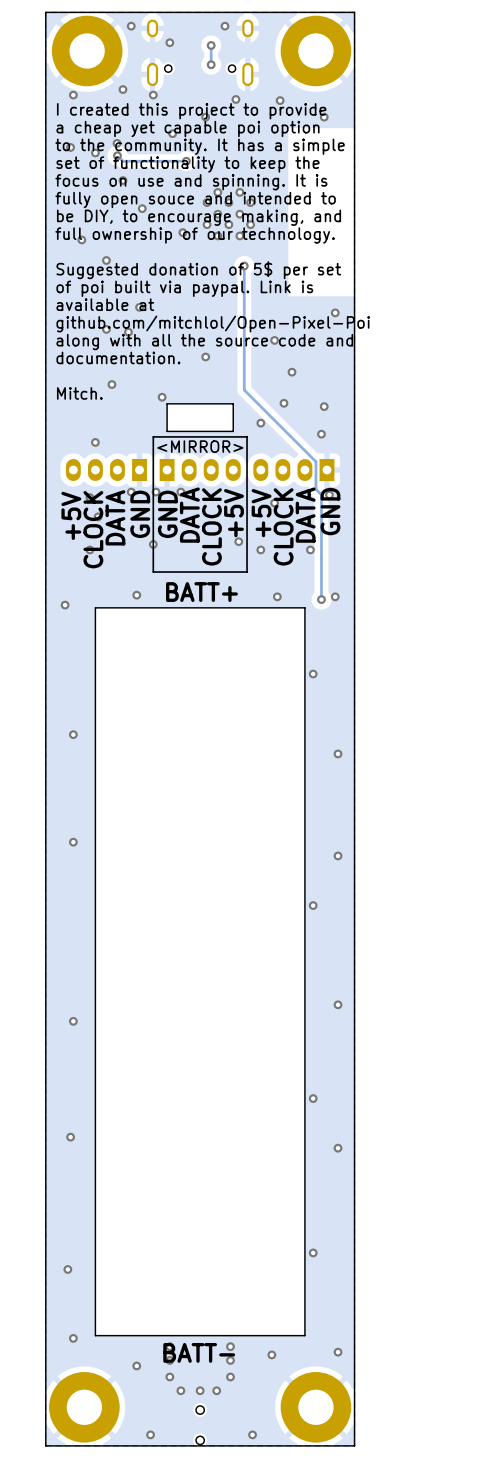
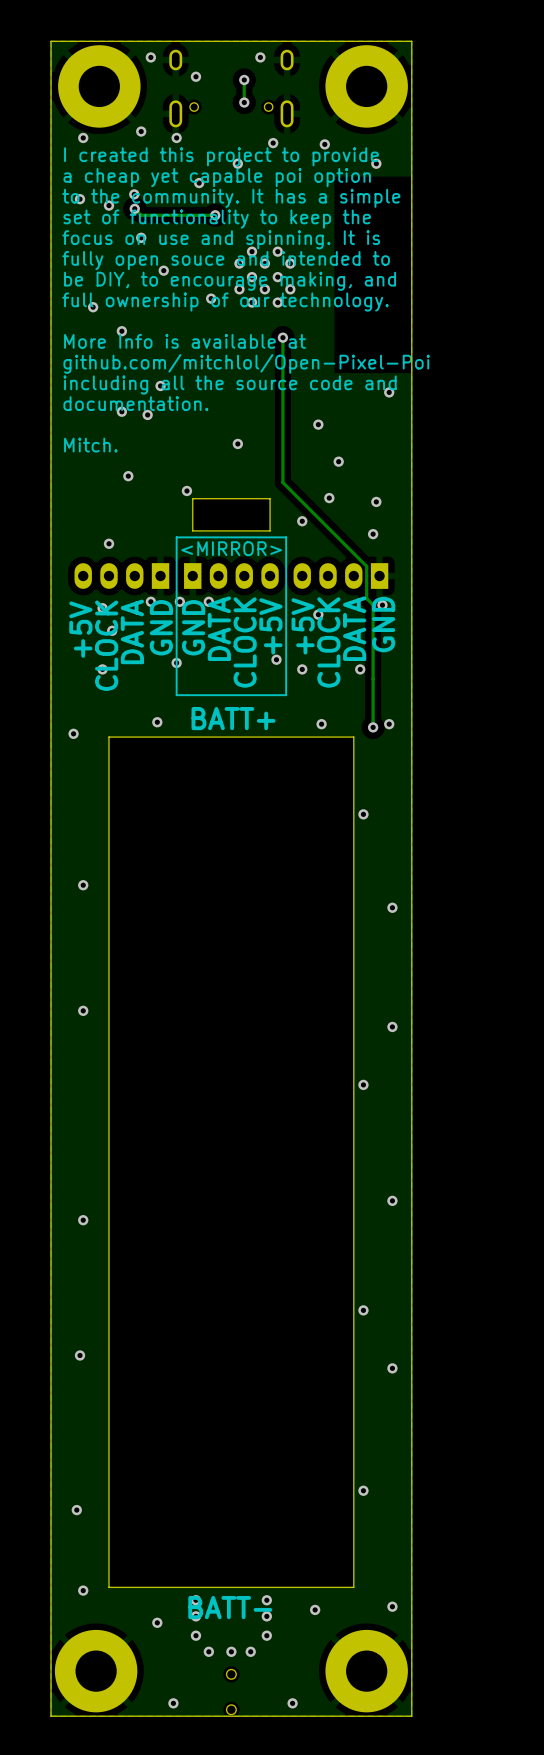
text: Suggested donation of 5$ per set (198, 270) -> More Info is available at (184, 341)
text: of poi built via paypal. Link is (184, 288) -> github.com/mitchlol/Open-Pixel-Poi (246, 363)
text: available at (105, 304) -> including all the source code and (230, 385)
text: github.com/mitchlol/Open-Pixel-Poi (213, 324) -> documentation. (135, 403)
text: along with all the source code and (204, 342) -> none
text: documentation. (118, 357) -> Mitch. (90, 445)
text: Mitch. (79, 393) -> none

